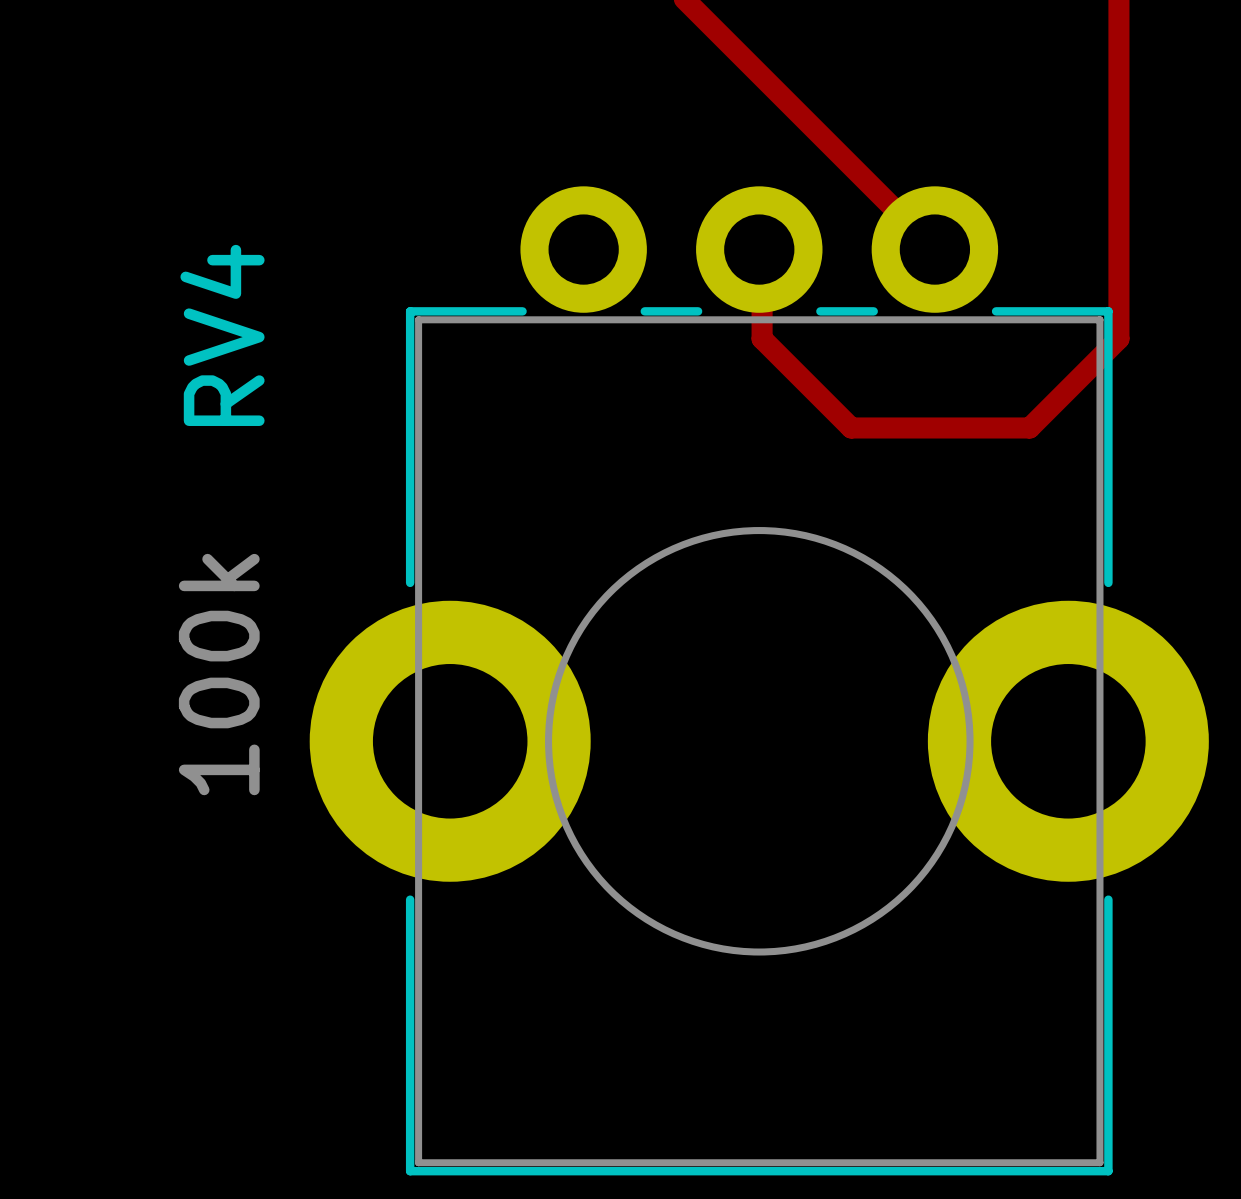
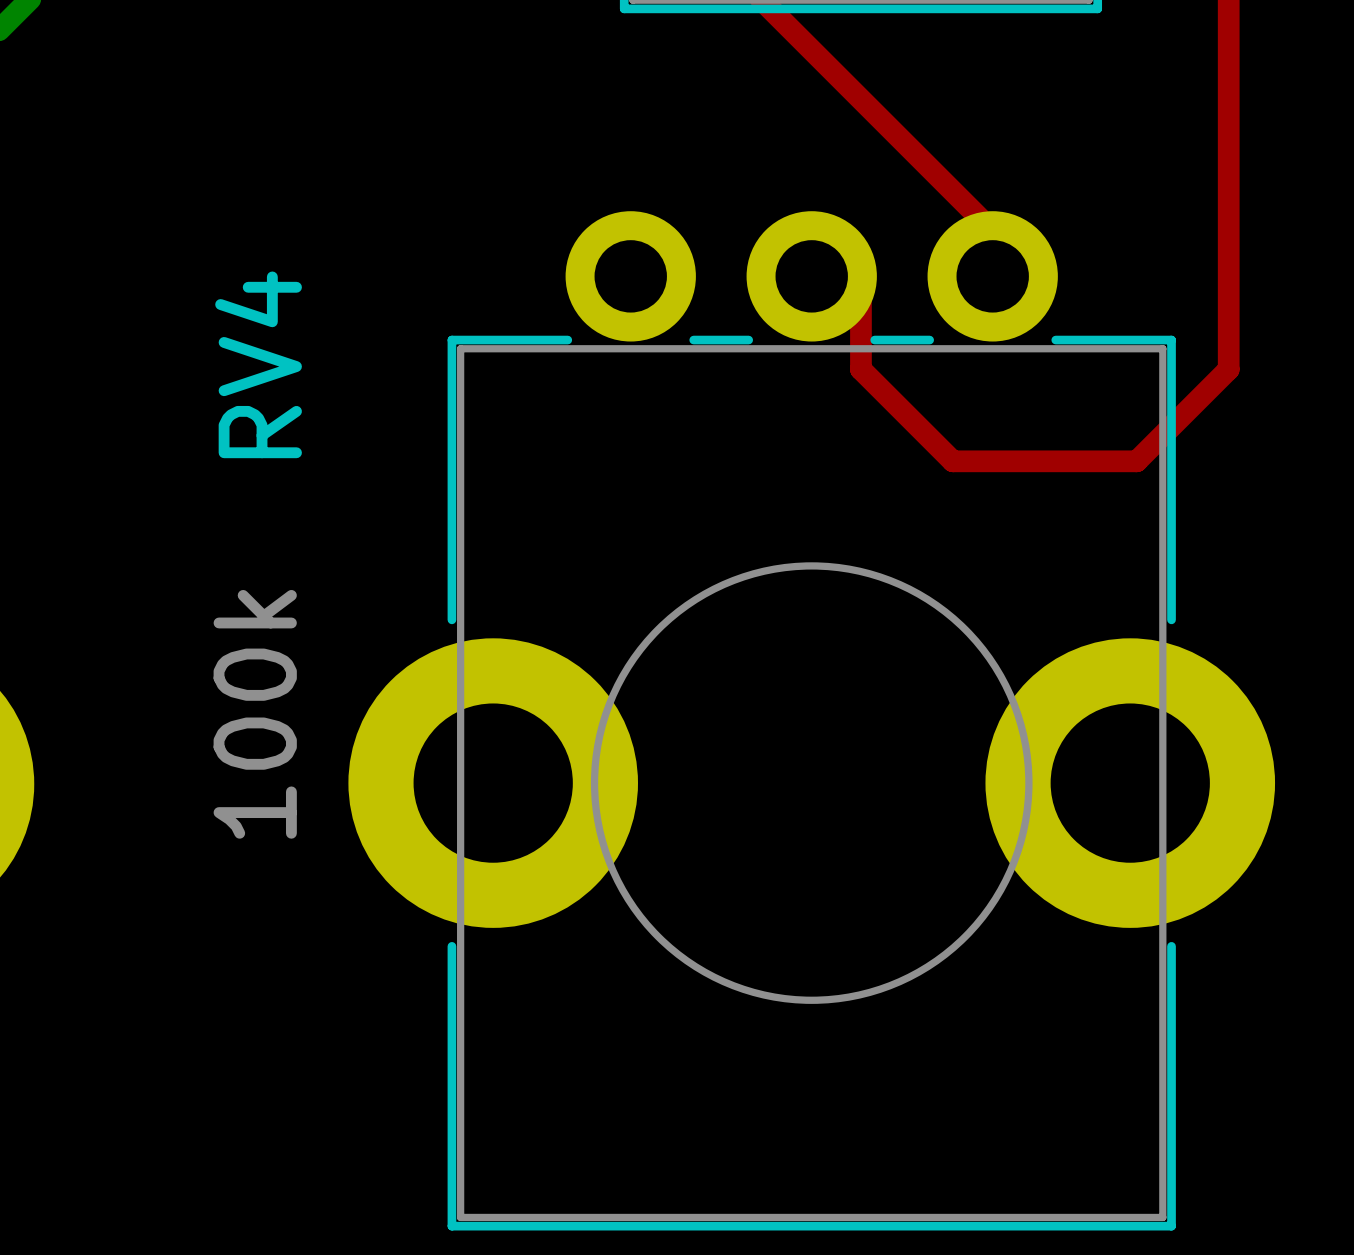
RV4 position: (759, 680) -> (811, 720)

